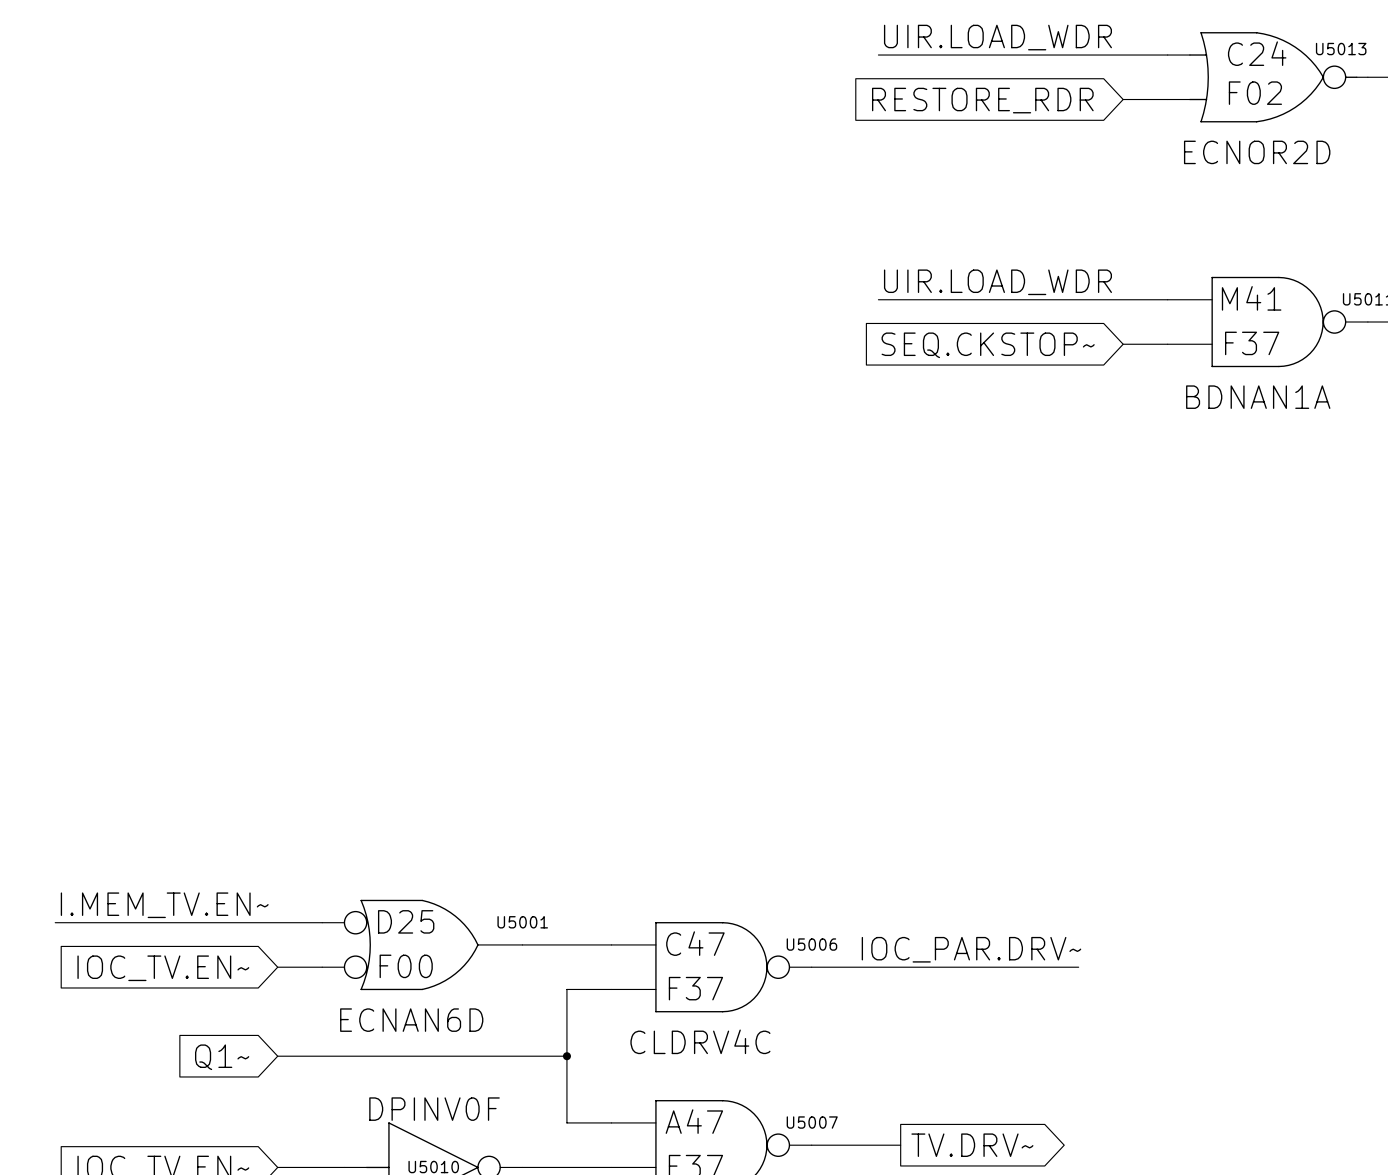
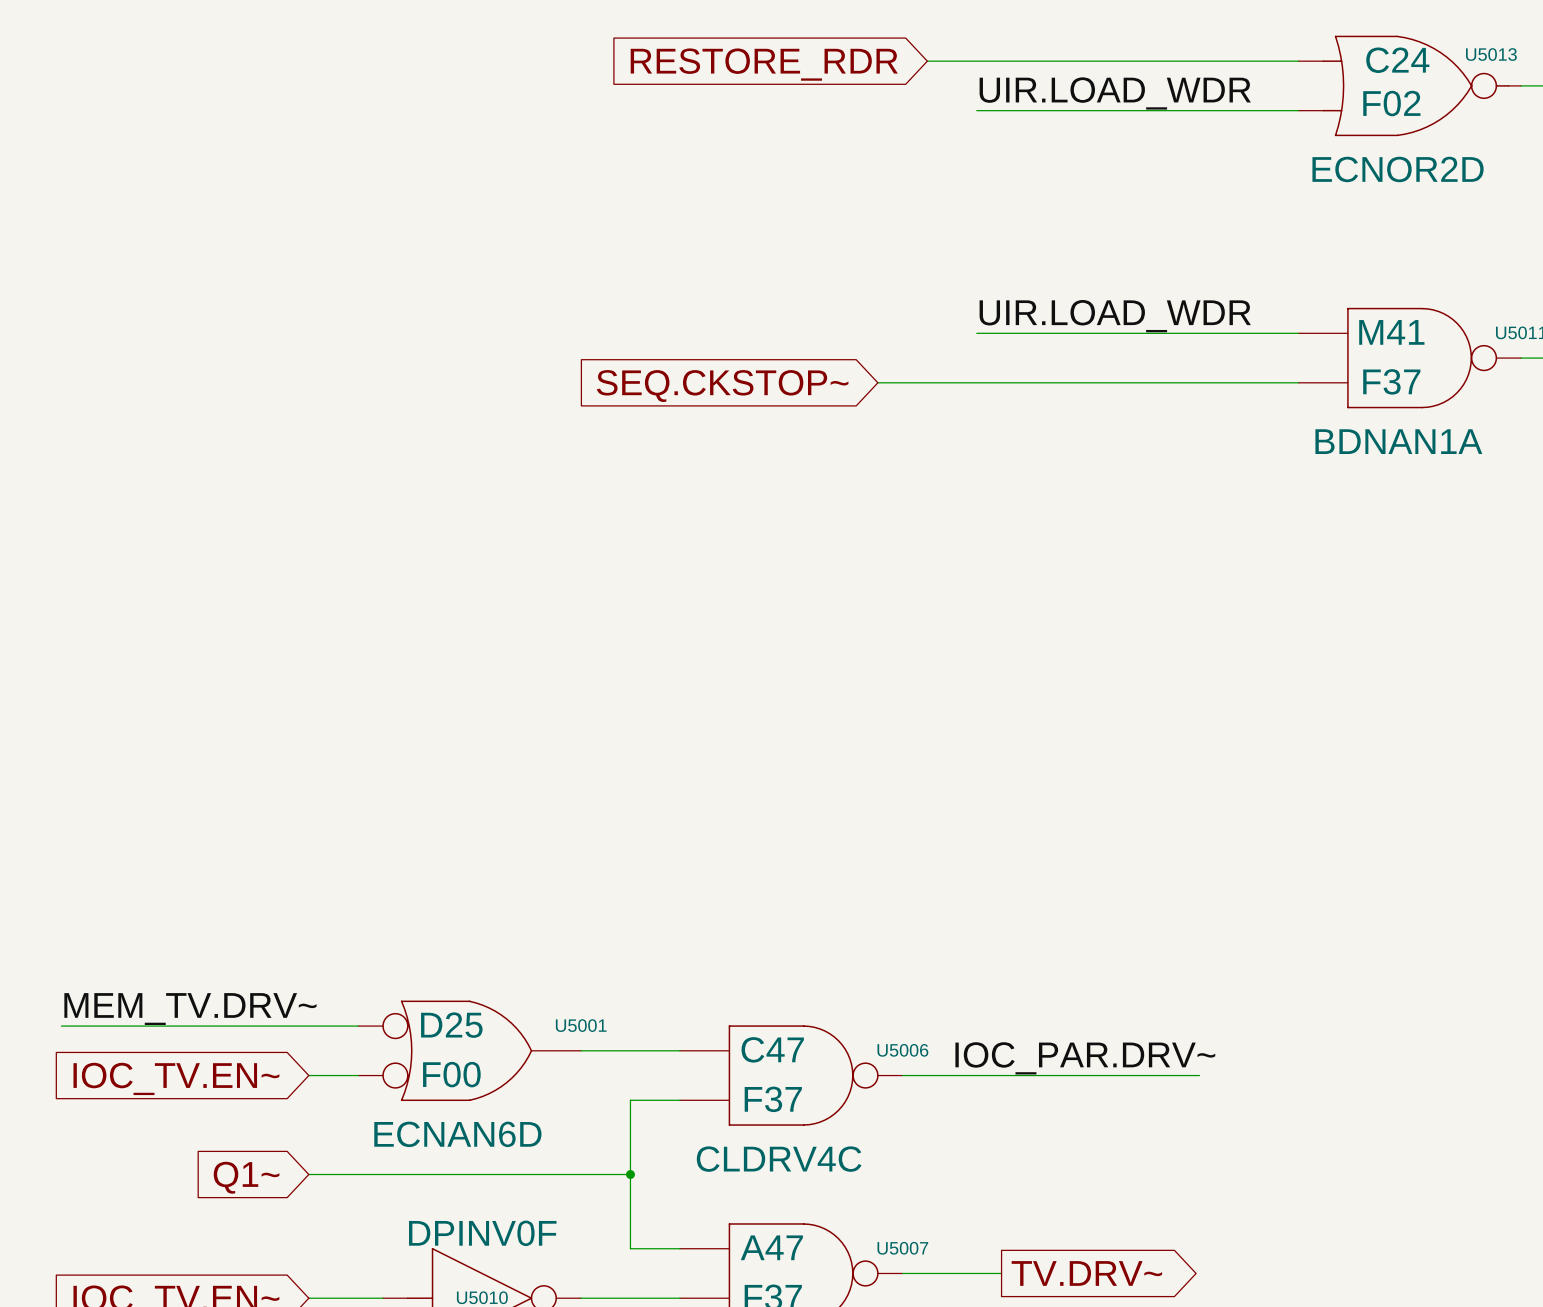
label position: UIR.LOAD_WDR (997, 37) -> UIR.LOAD_WDR (1115, 93)
wire: none -> (927, 61) (976, 61)
global label: none -> RESTORE_RDR (764, 64)
wire: none -> (976, 110) (1248, 110)
global label: RESTORE_RDR (982, 100) -> none
wire: none -> (877, 382) (1248, 382)
global label: none -> SEQ.CKSTOP~ (722, 386)
global label: SEQ.CKSTOP~ (988, 345) -> none
label: I.MEM_TV.EN~ (164, 905) -> MEM_TV.DRV~ (190, 1009)

